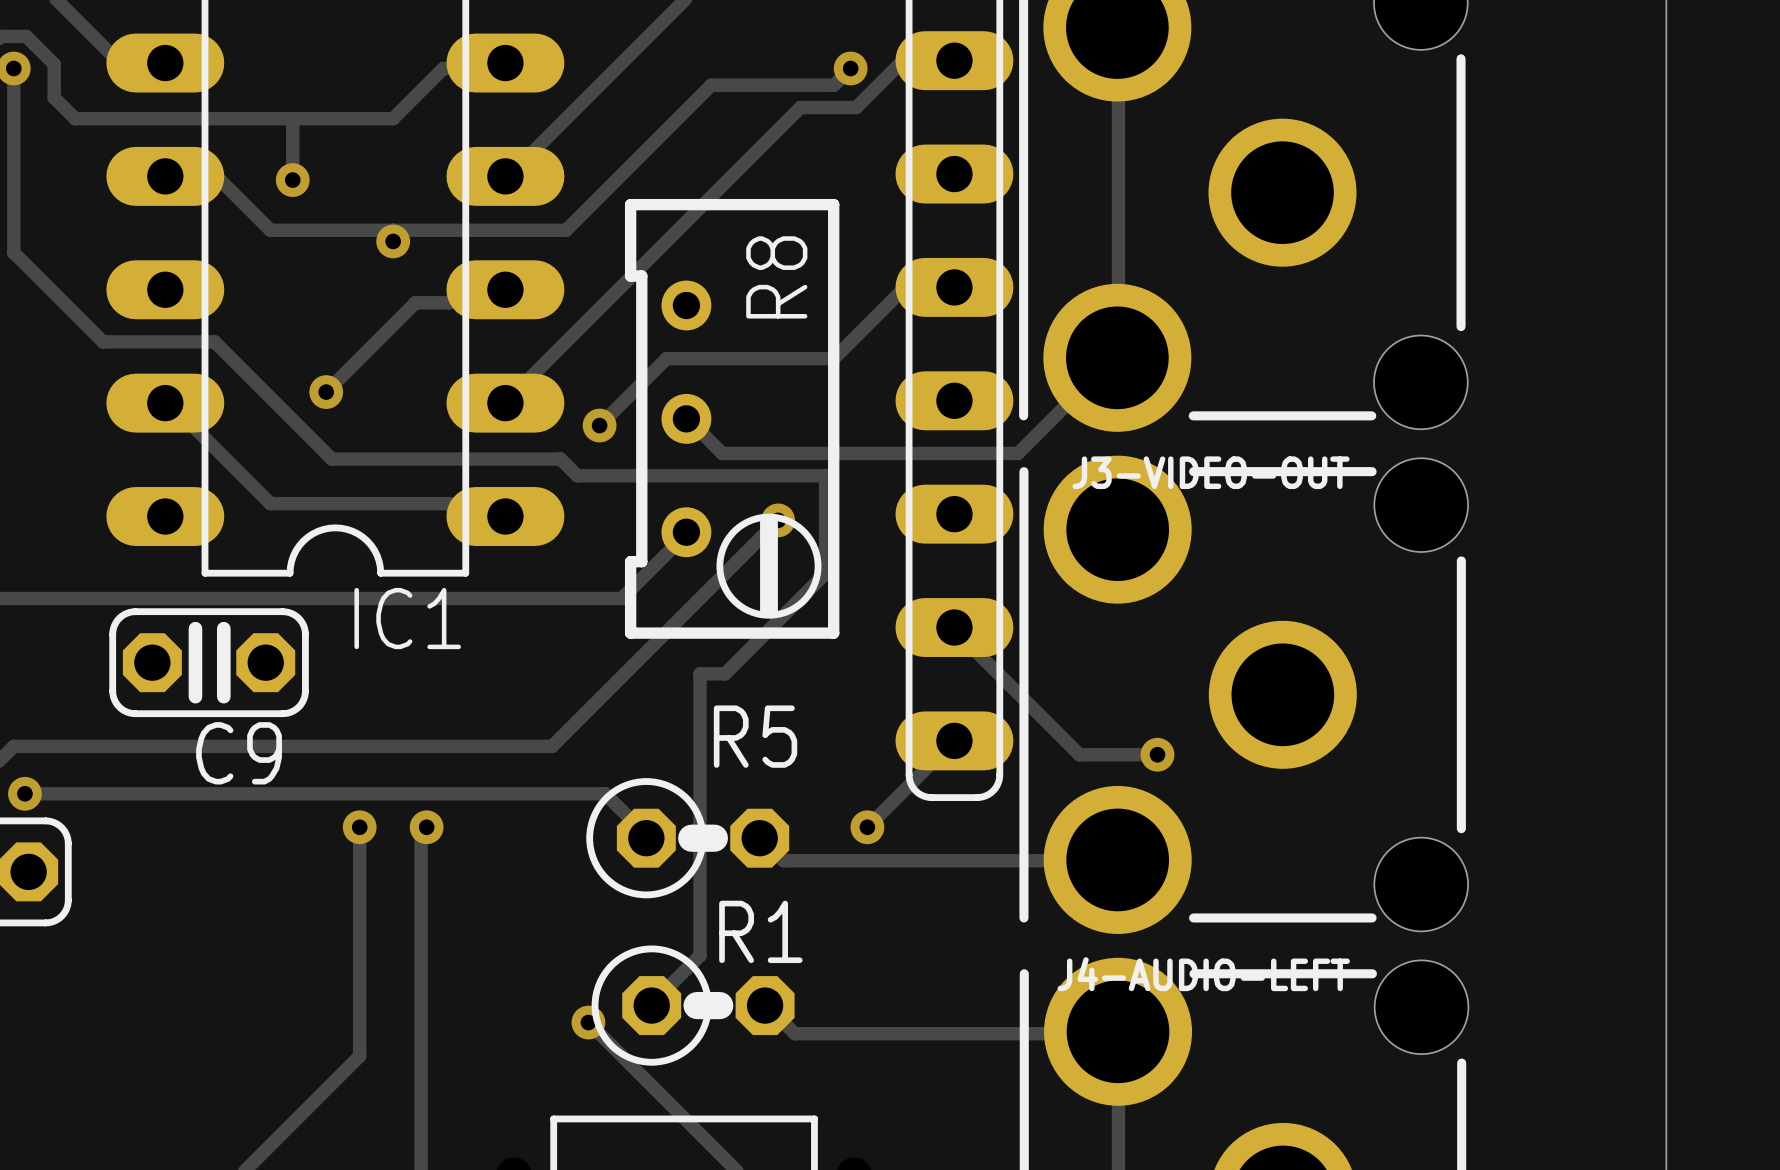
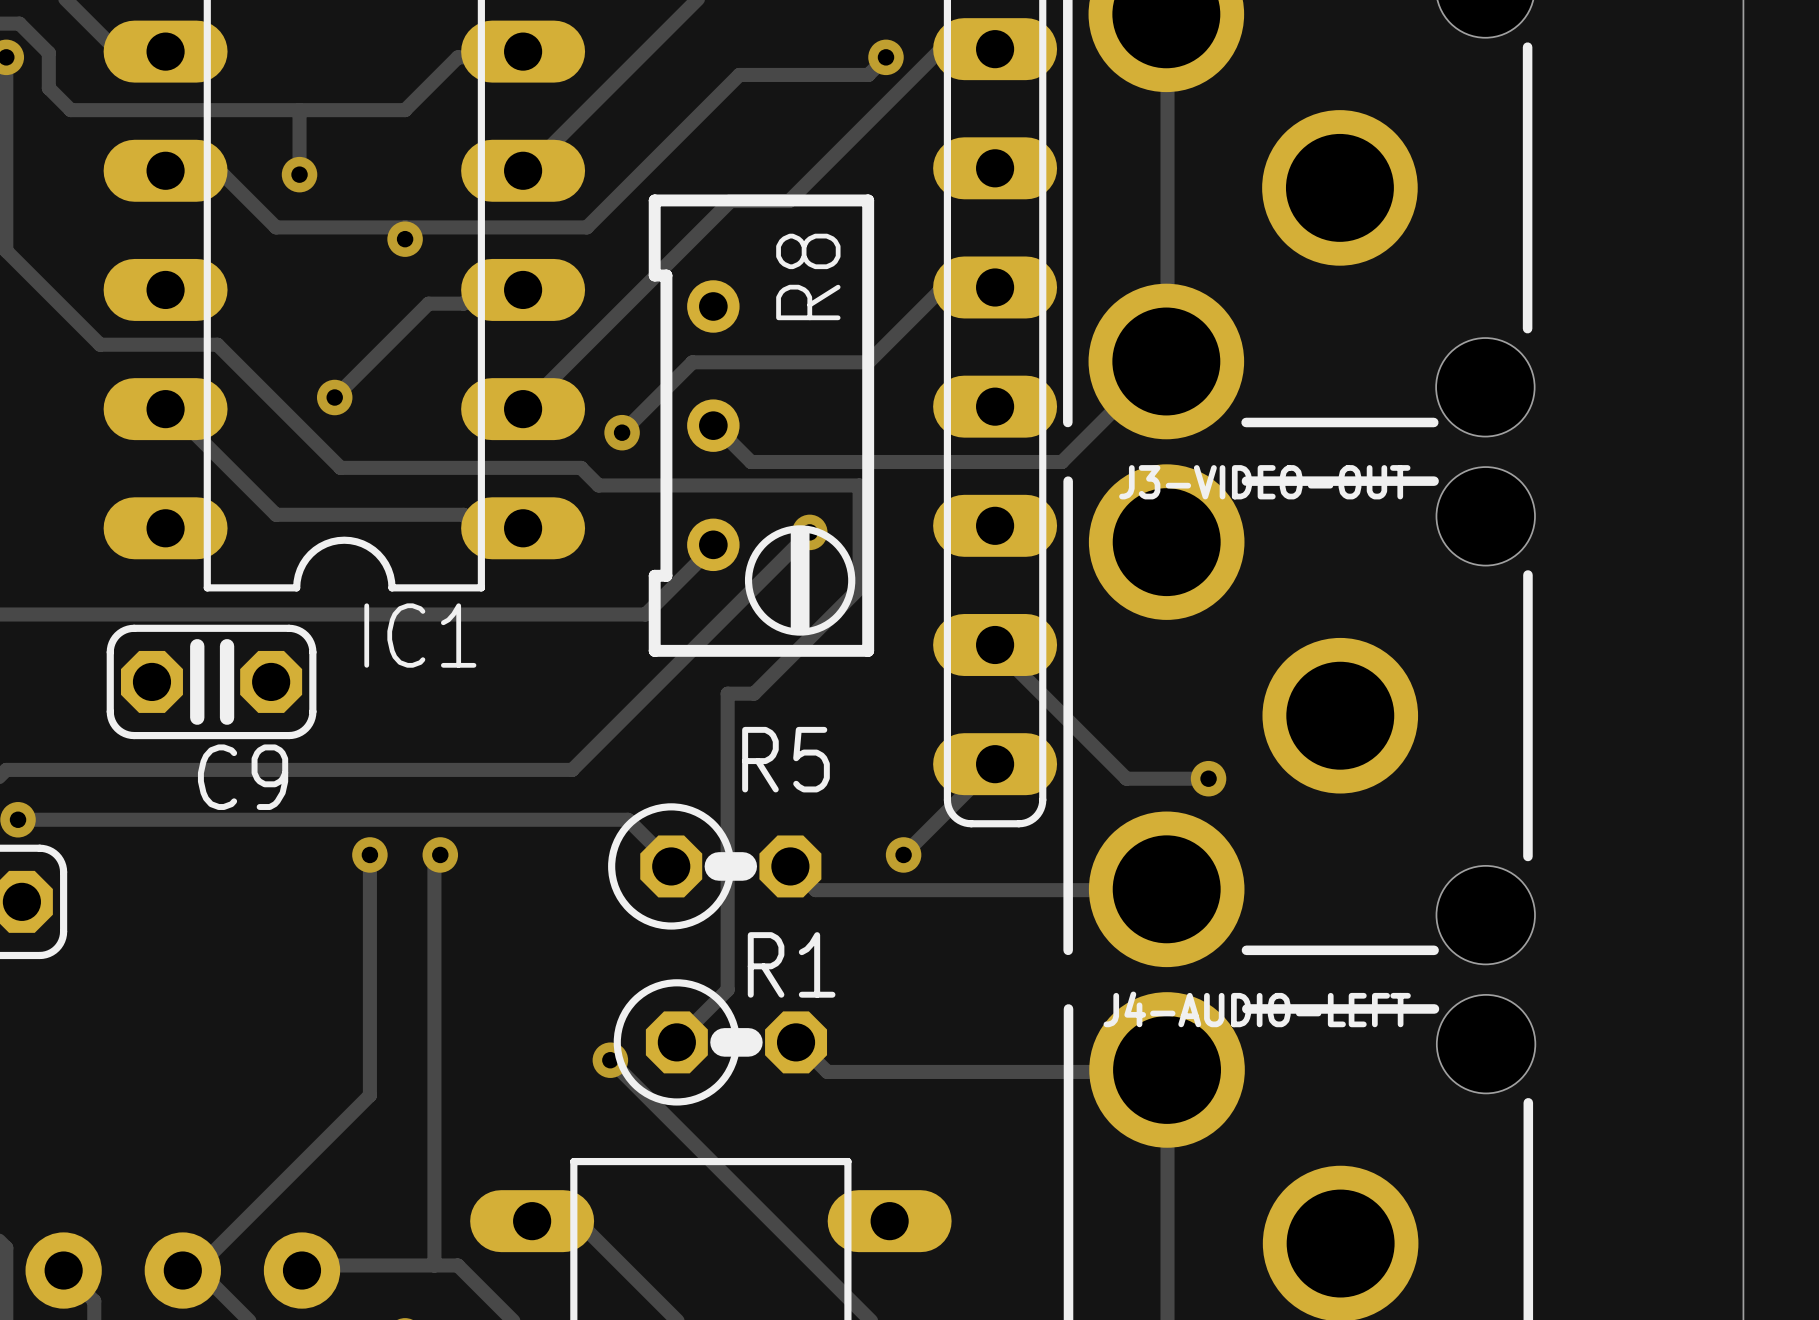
track: (856, 107) (800, 107) (702, 205) -> (891, 98) (789, 201) (730, 201)

